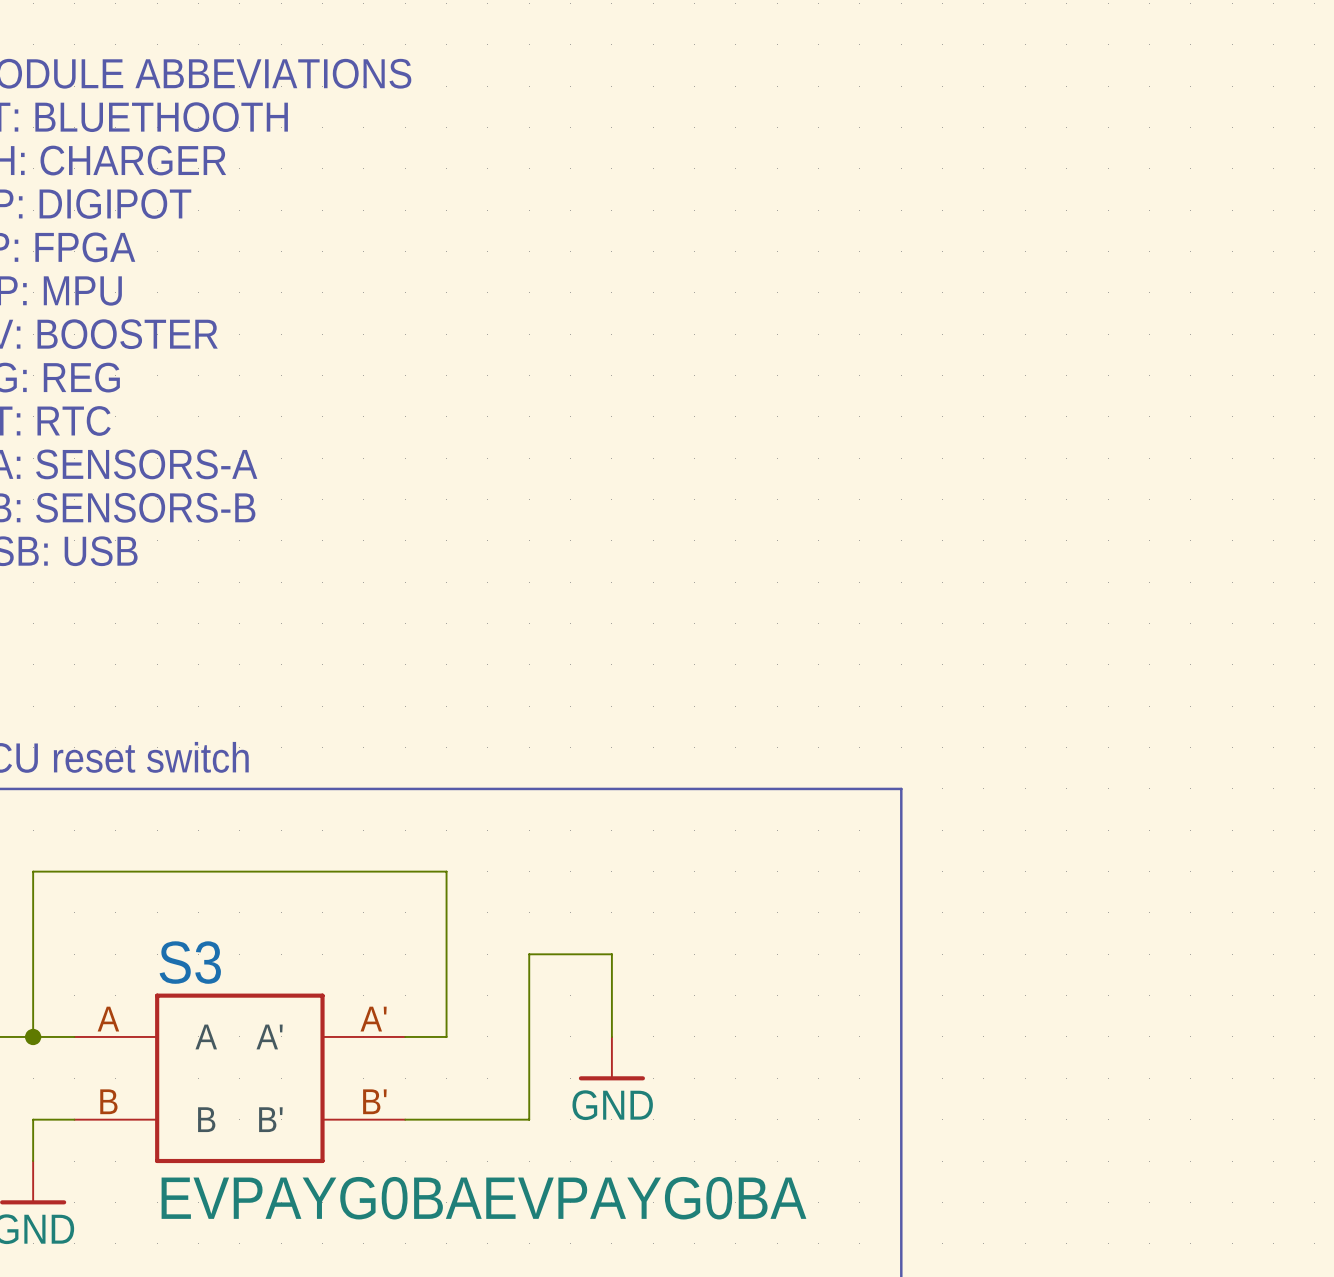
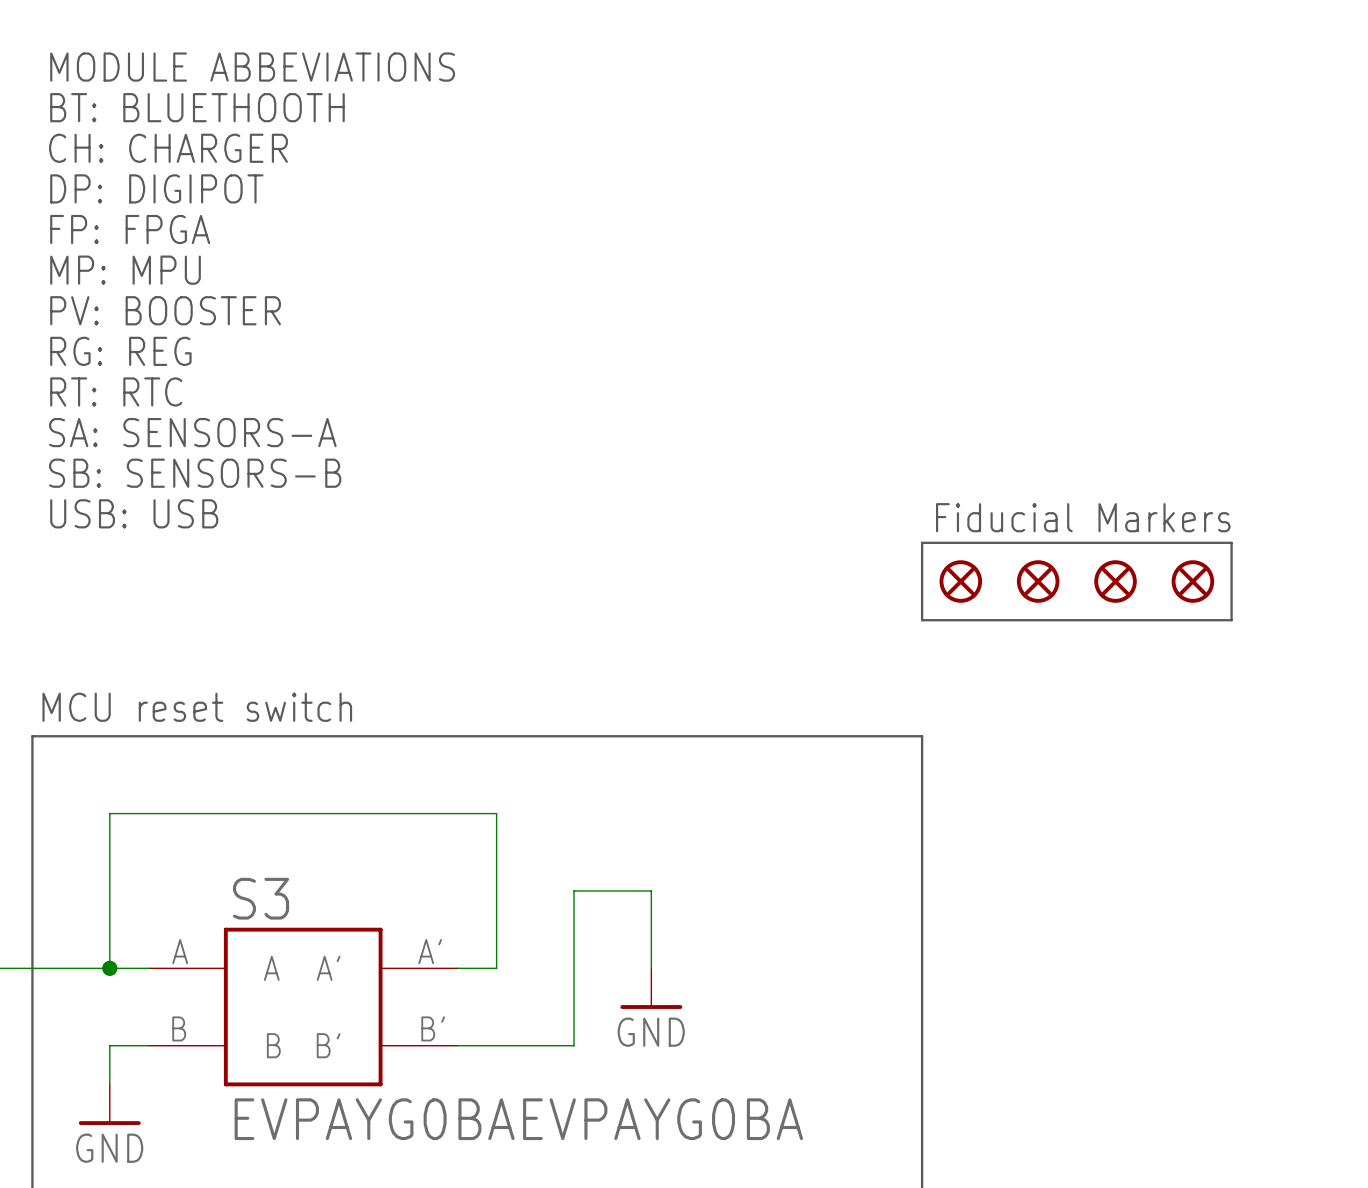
text: none -> Fiducial Markers (1083, 517)
line: none -> (922, 542) (922, 620) (1231, 620) (1231, 542) (922, 542)
part: none -> (960, 581)
part: none -> (1038, 581)
part: none -> (1115, 581)
part: none -> (1192, 581)

